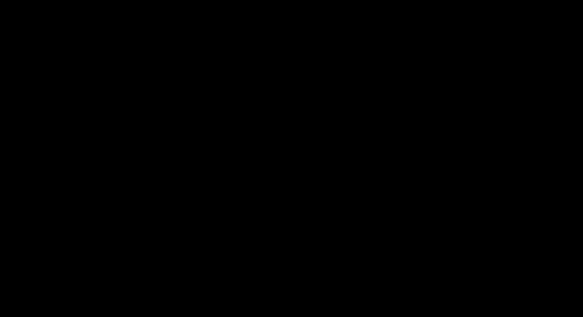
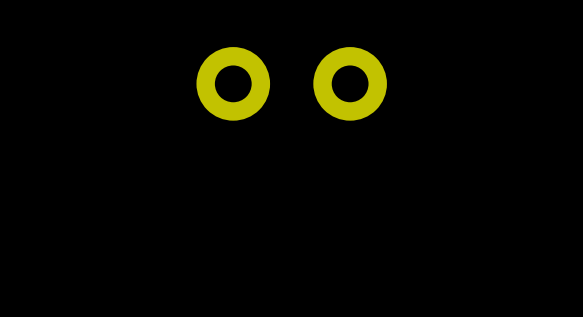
part: none -> (291, 83)

